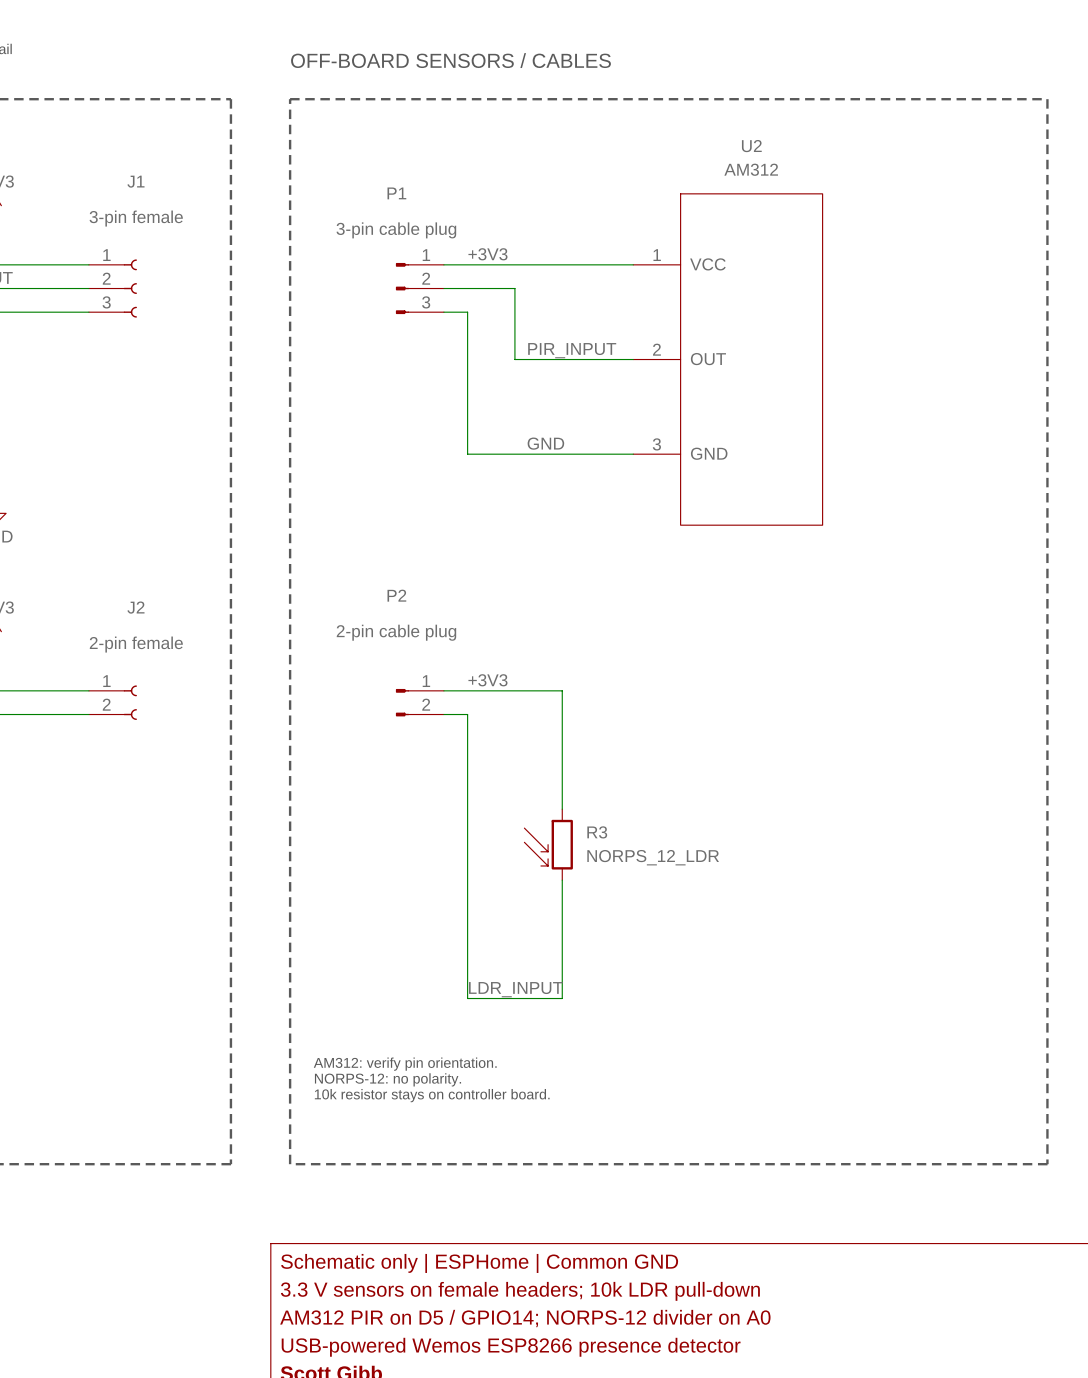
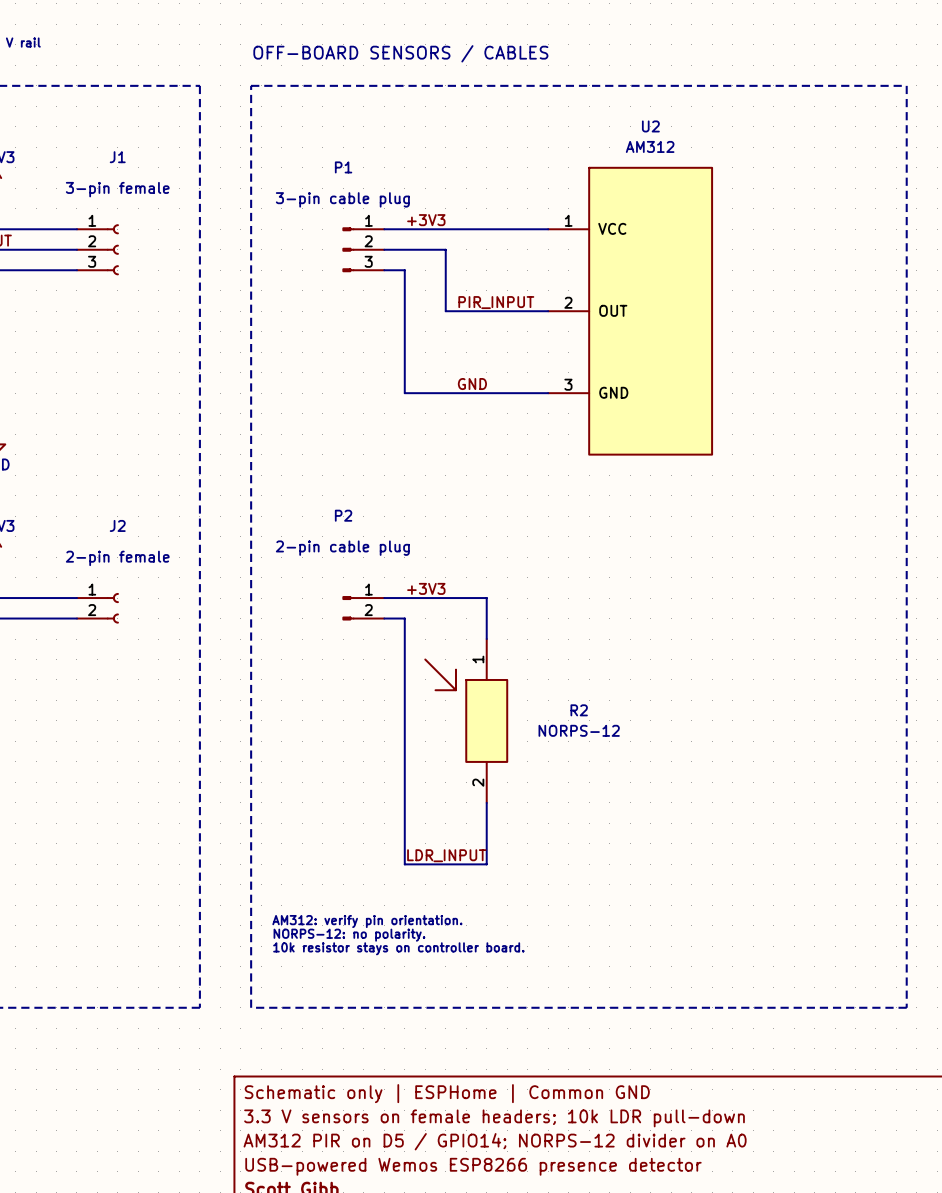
R2: none -> NORPS-12 (466, 720)
R3: NORPS_12_LDR (548, 844) -> none

